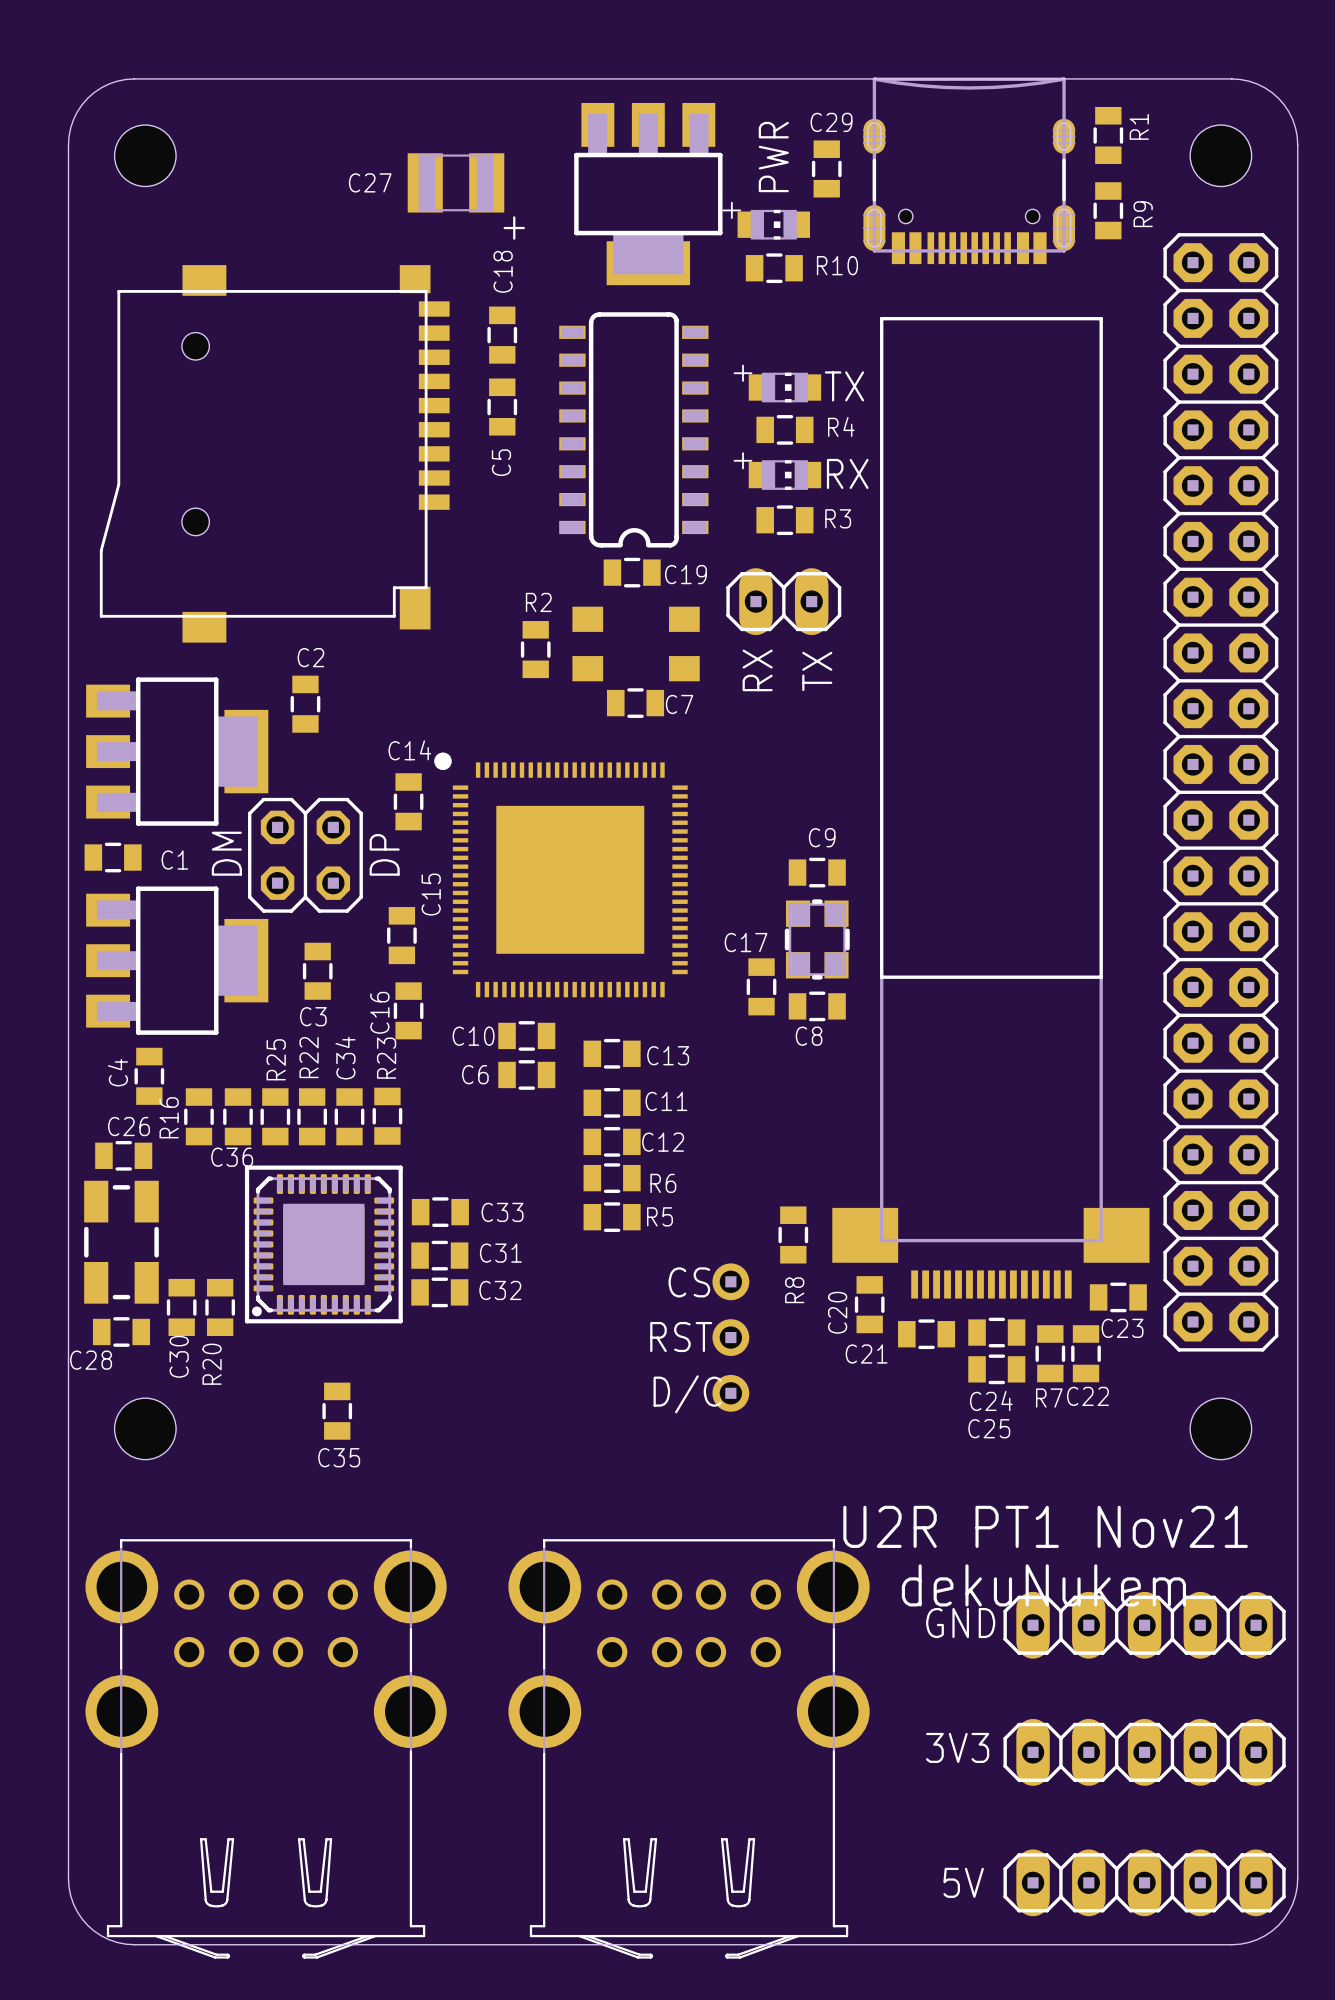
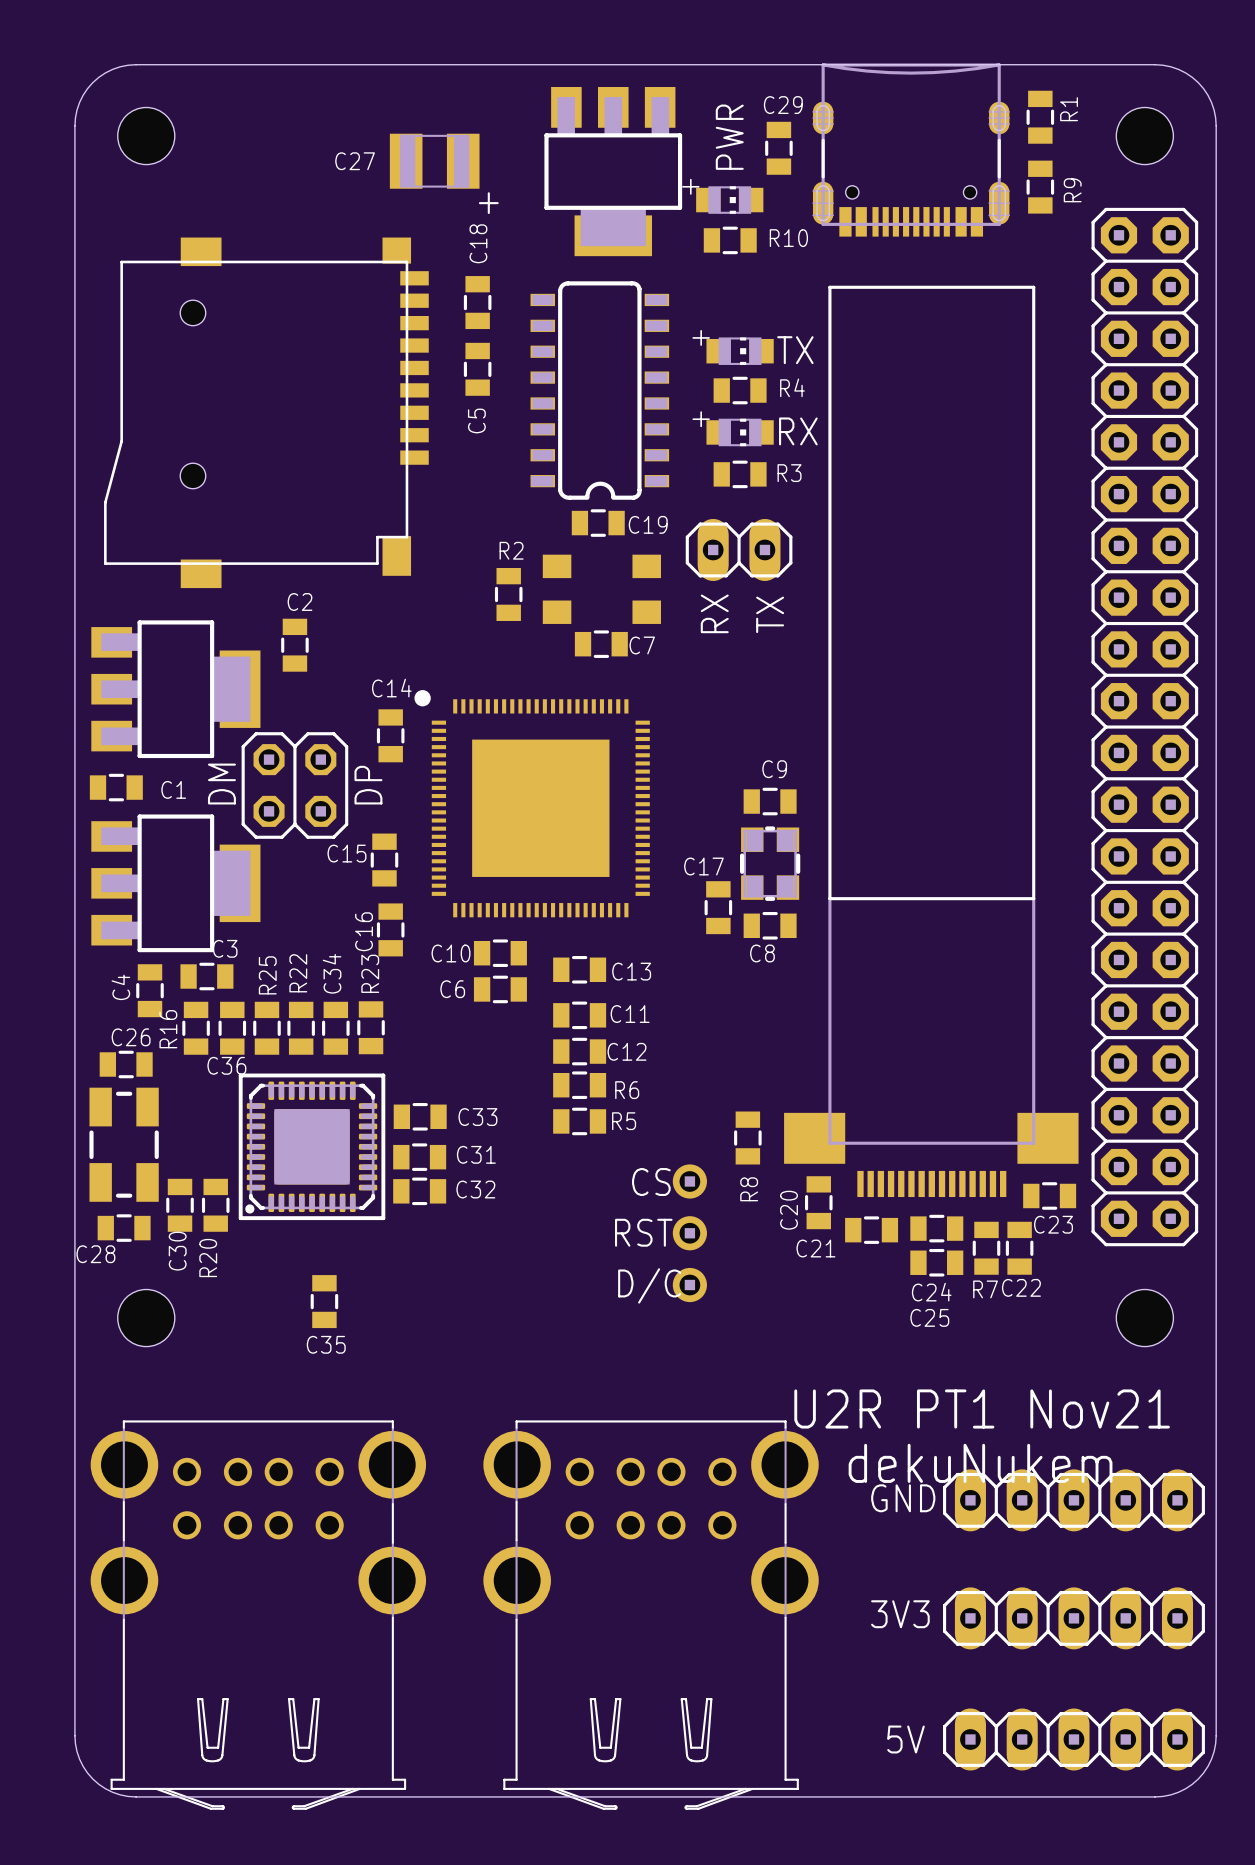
C15 name rotation: 0° (431, 894) -> 90° clockwise (346, 853)
C15 name position: C15 (431, 894) -> C15 (346, 853)
C3 rotation: 0° (317, 971) -> 90° clockwise (206, 976)
C3 position: (317, 971) -> (206, 976)
C3 name position: C3 (313, 1016) -> C3 (225, 948)

